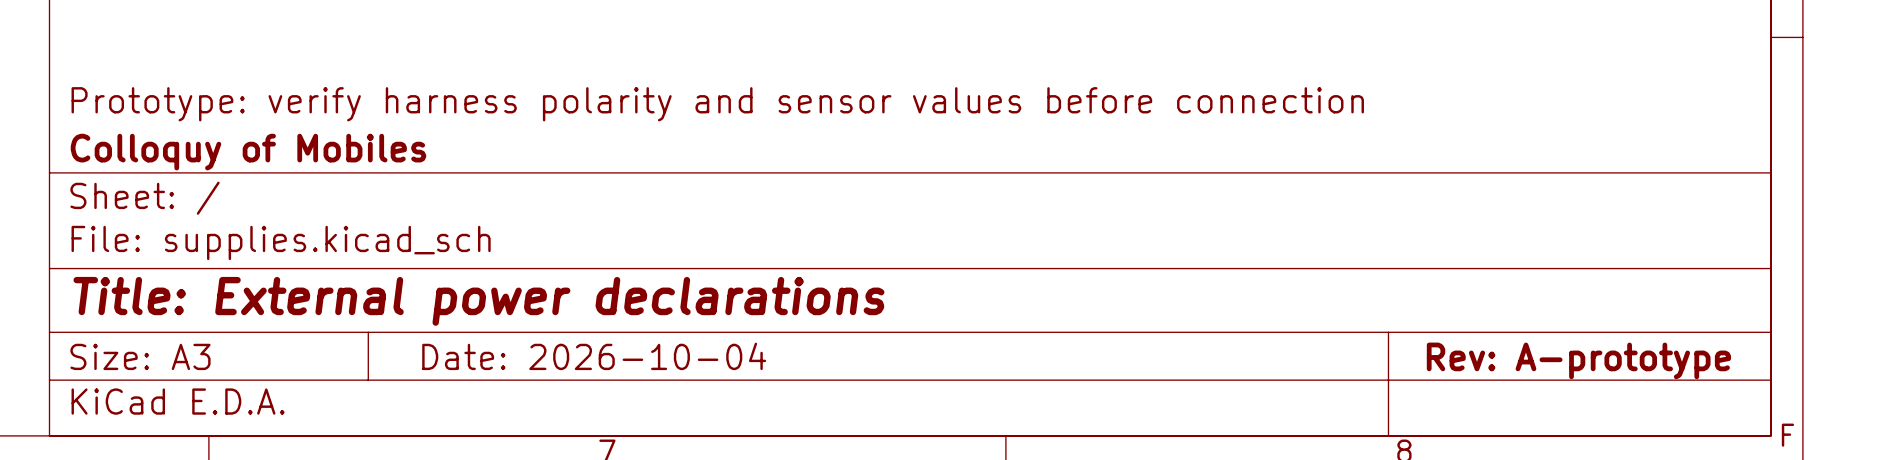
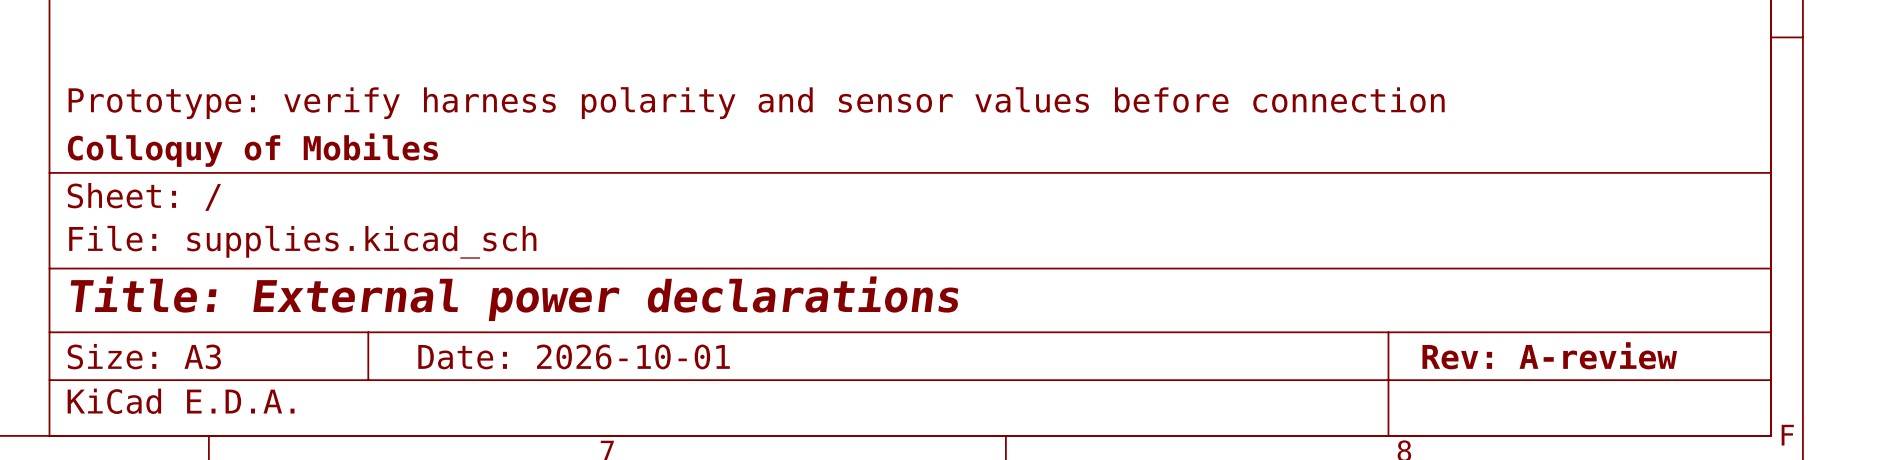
title block: Date: 2026-10-04 (594, 356) -> Date: 2026-10-01 (574, 356)
title block: Rev: A-prototype (1578, 360) -> Rev: A-review (1549, 355)

